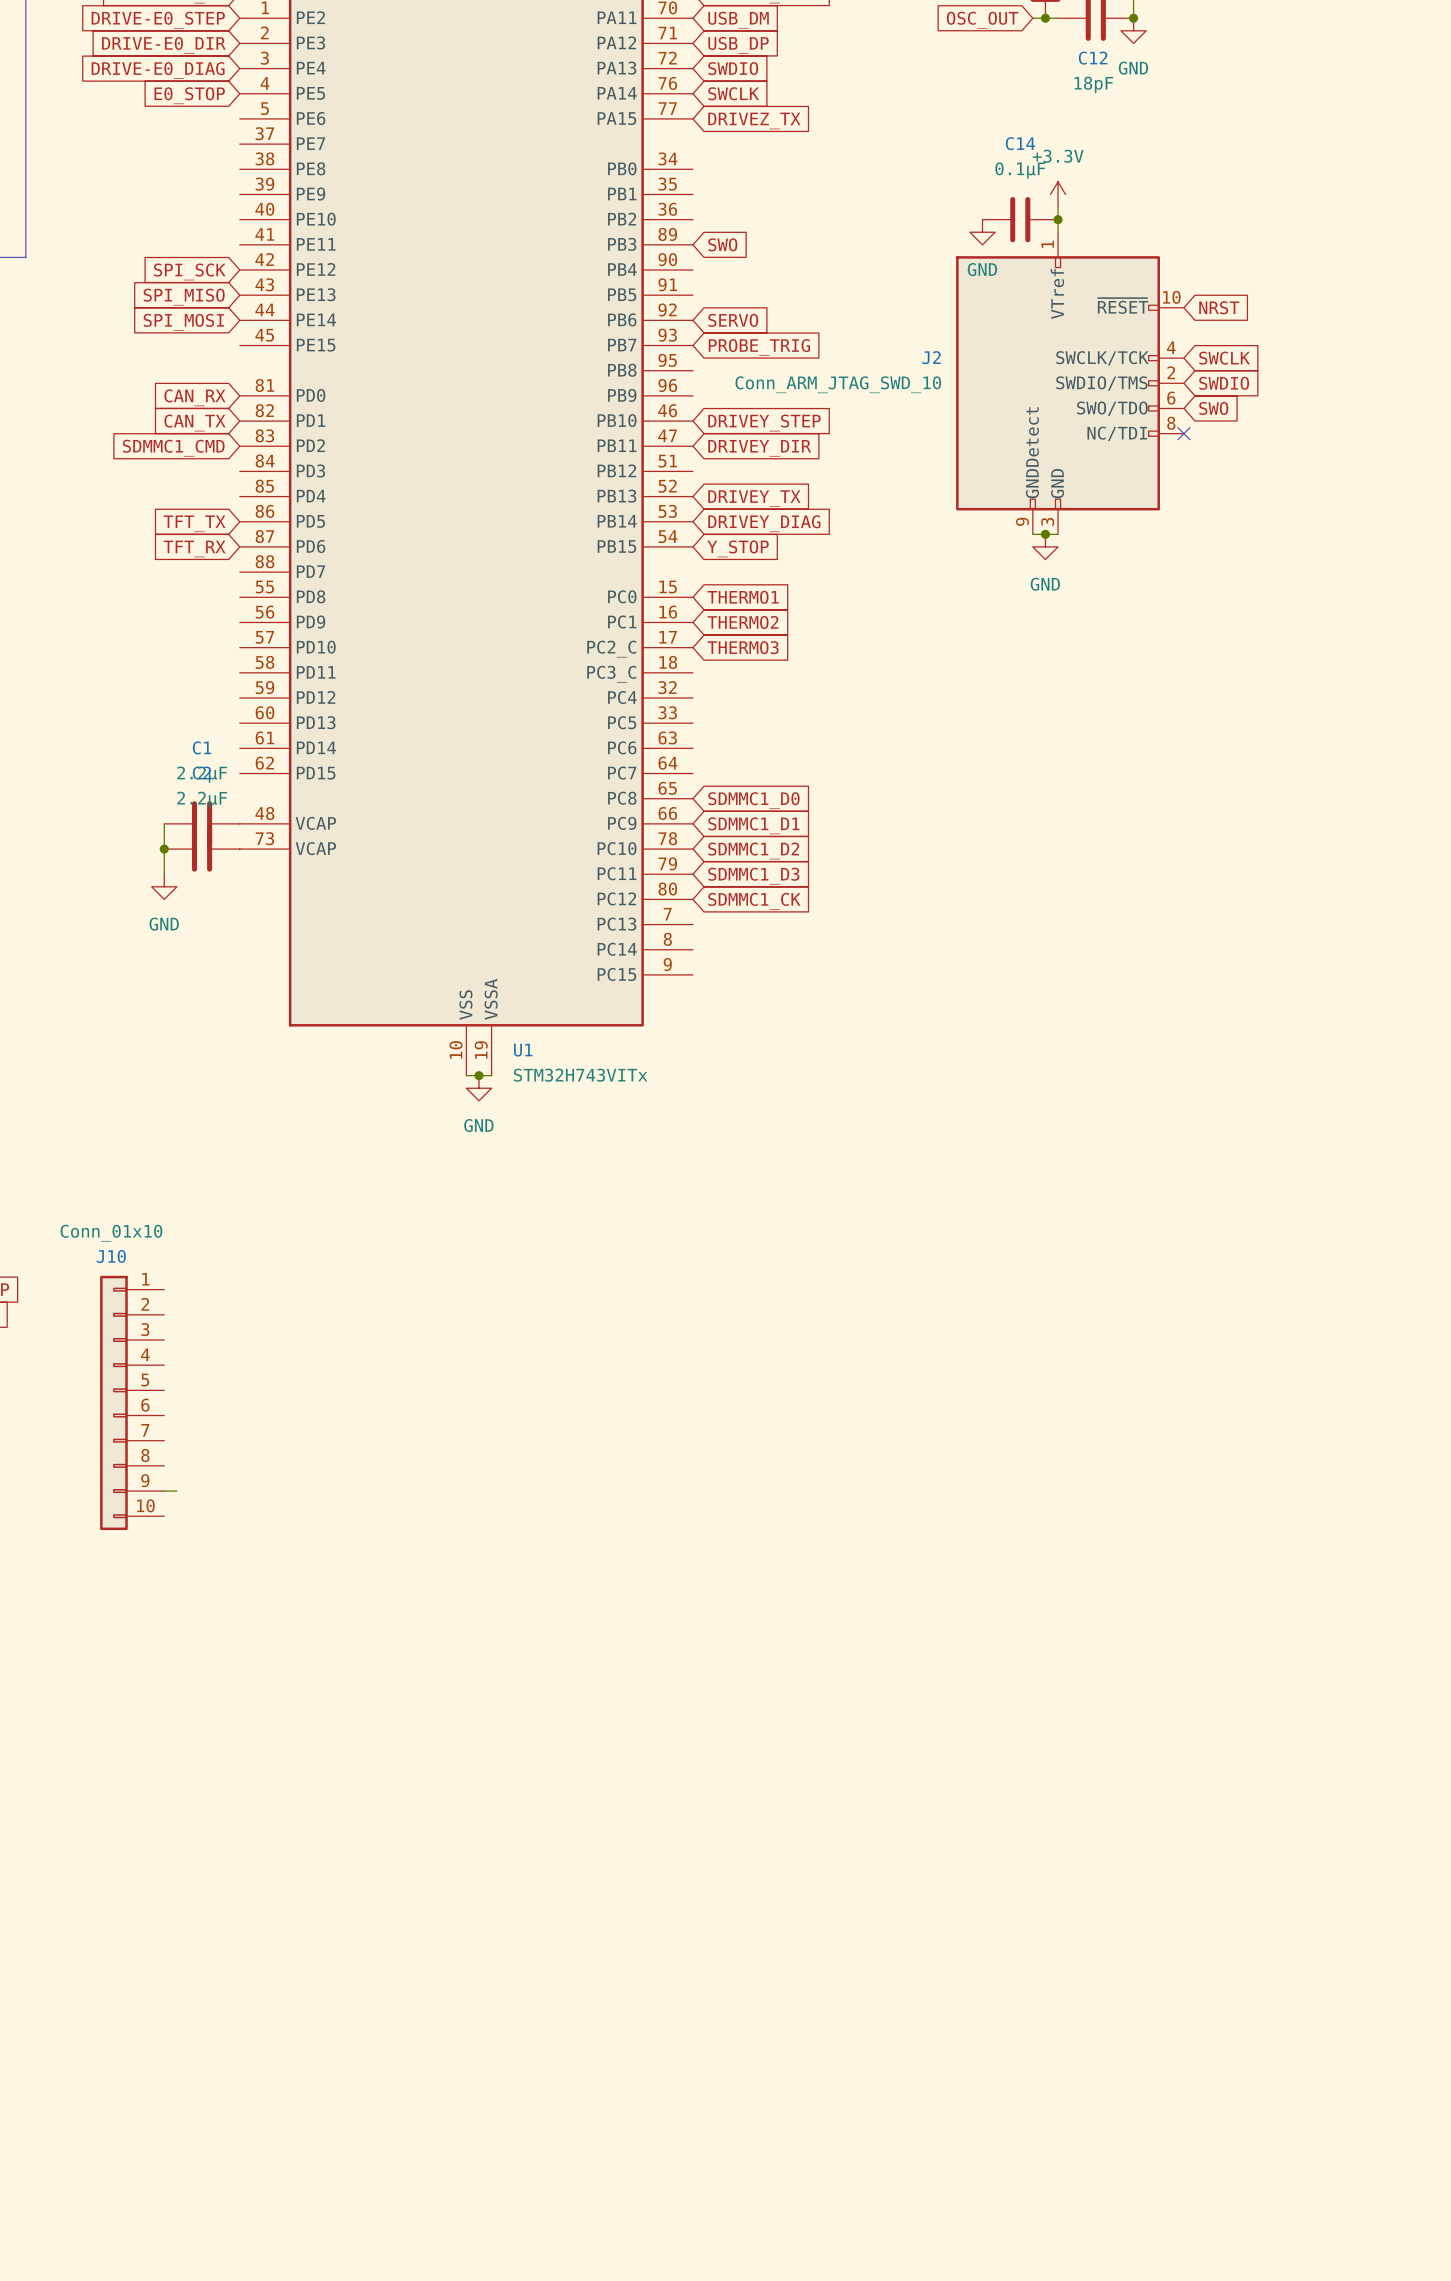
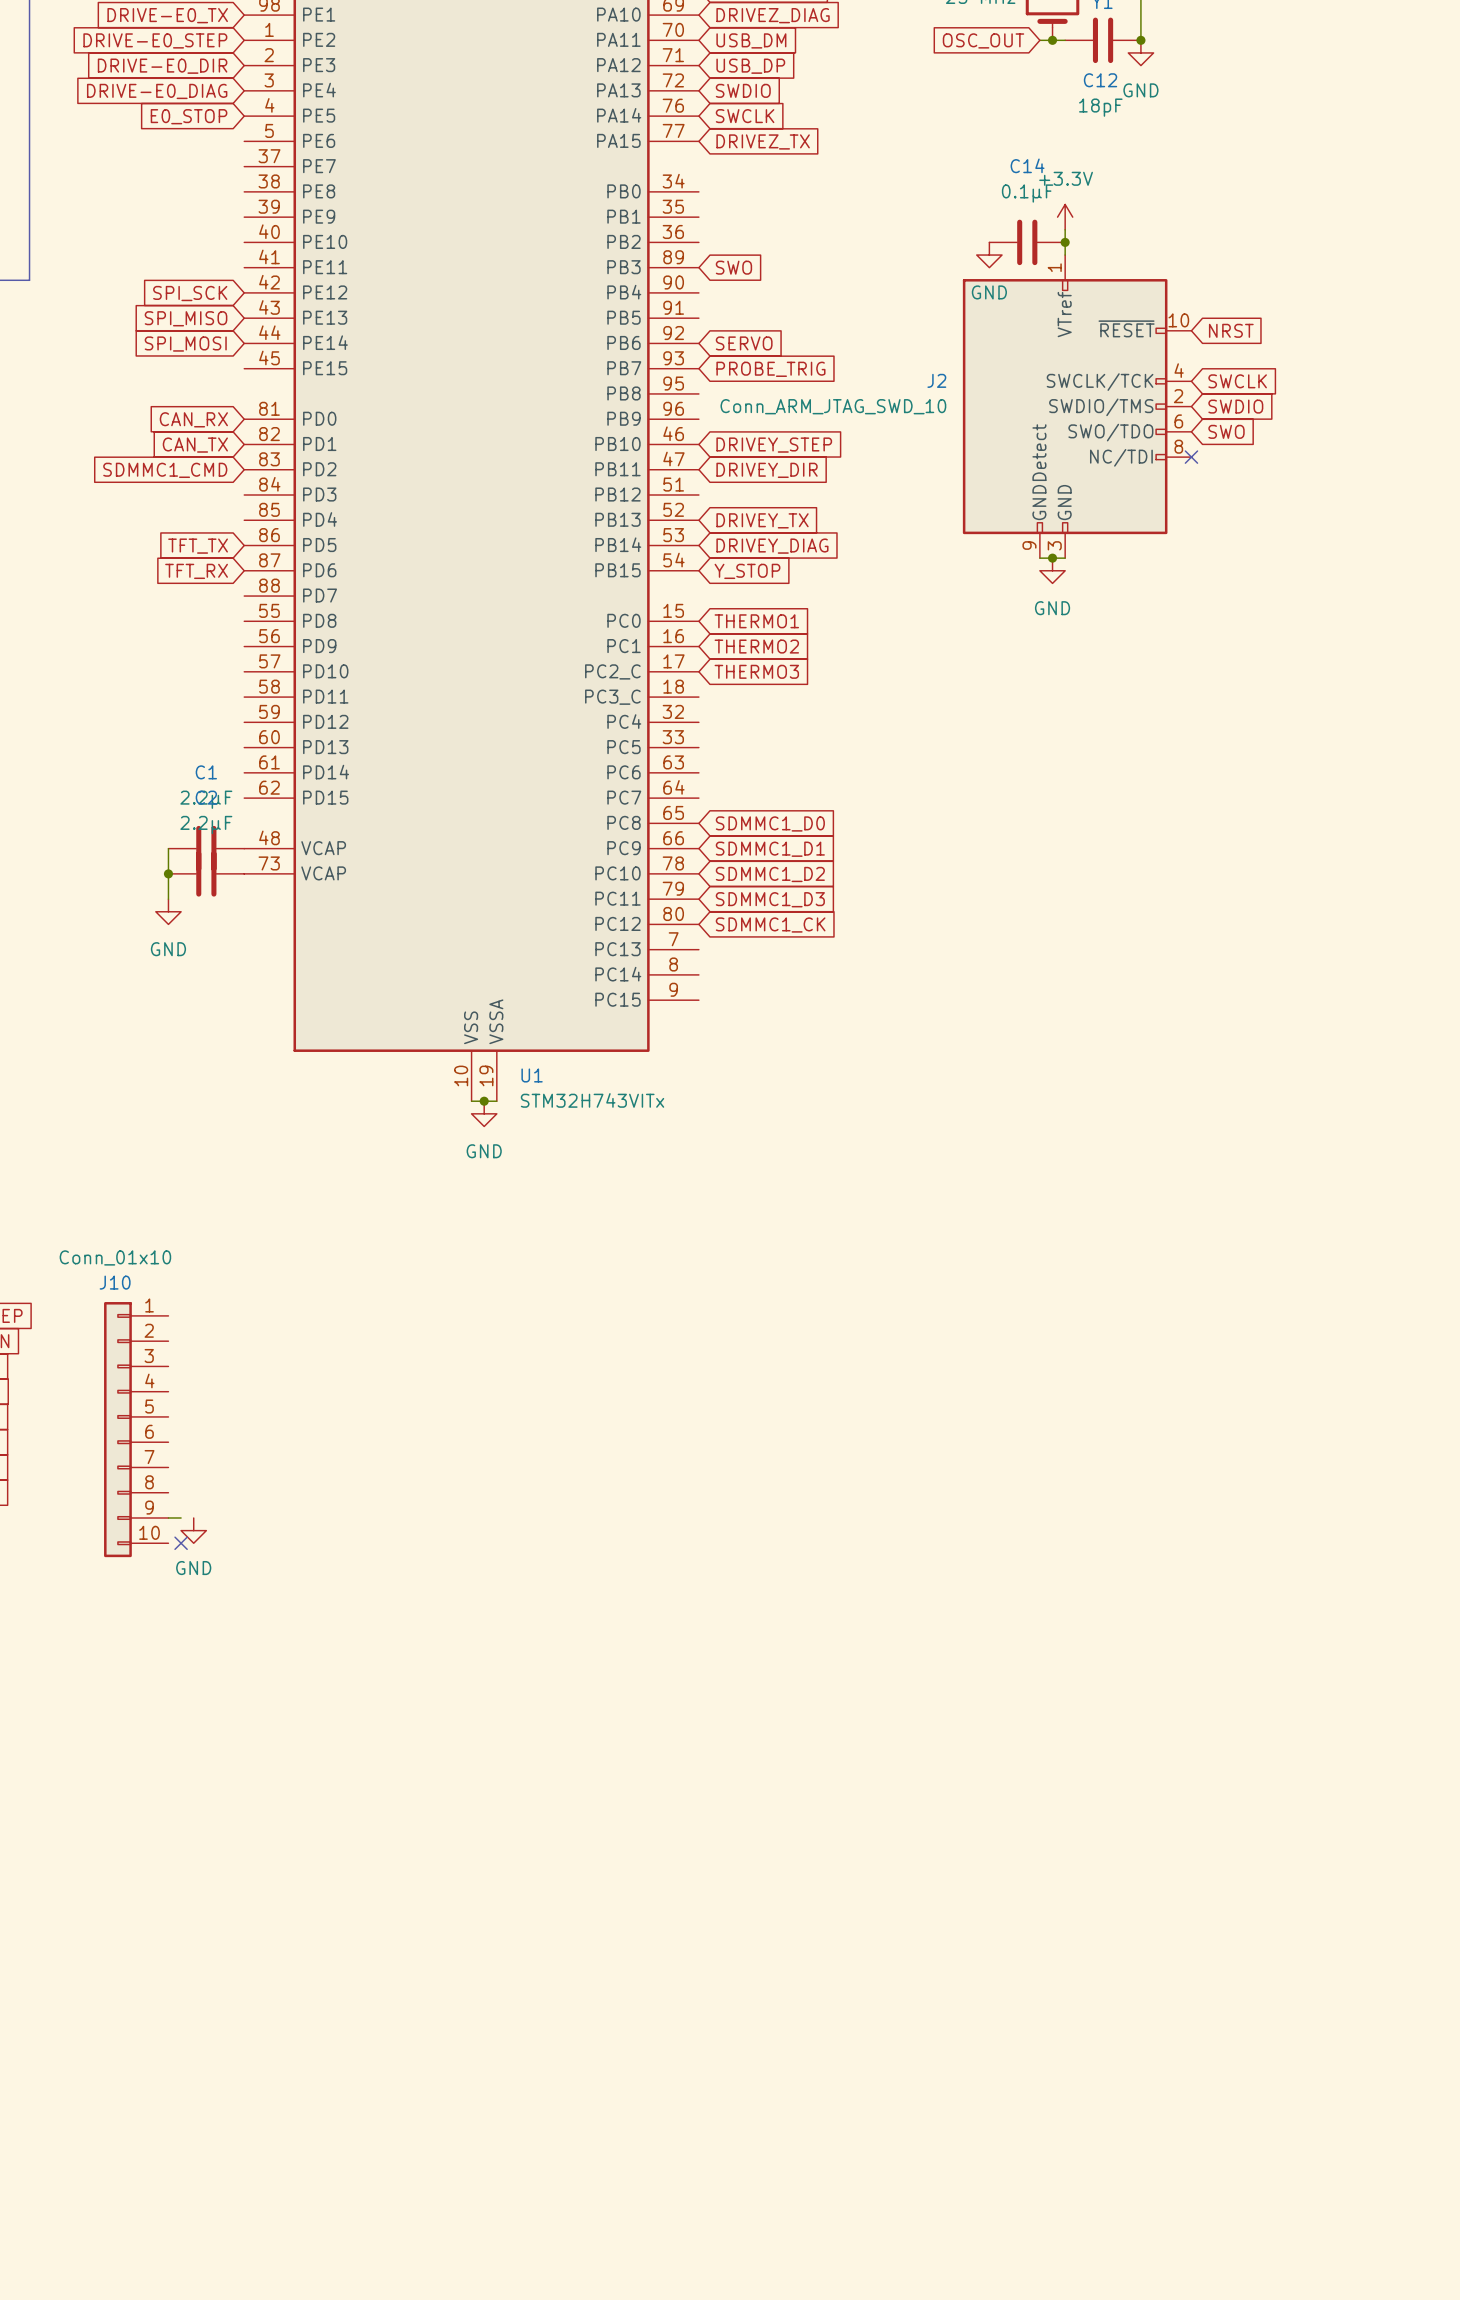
power symbol: none -> GND (193, 1530)
no-connect mark: none -> (181, 1543)

